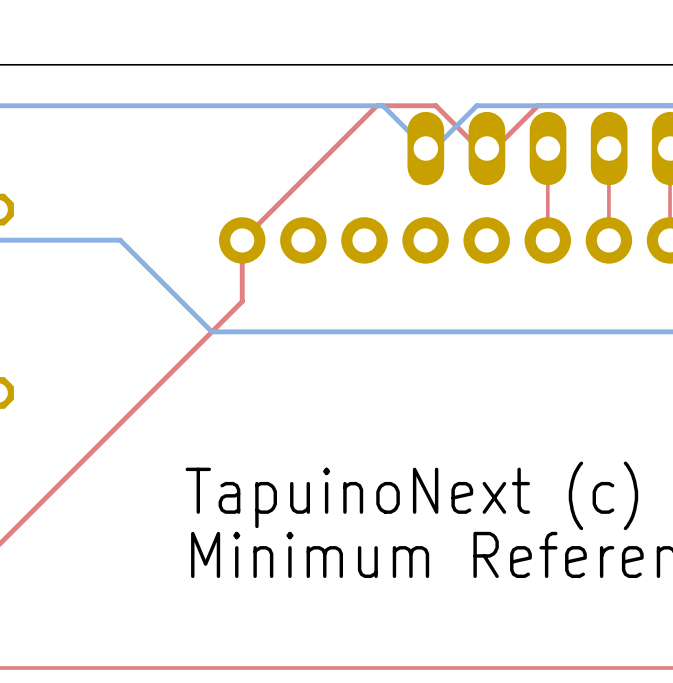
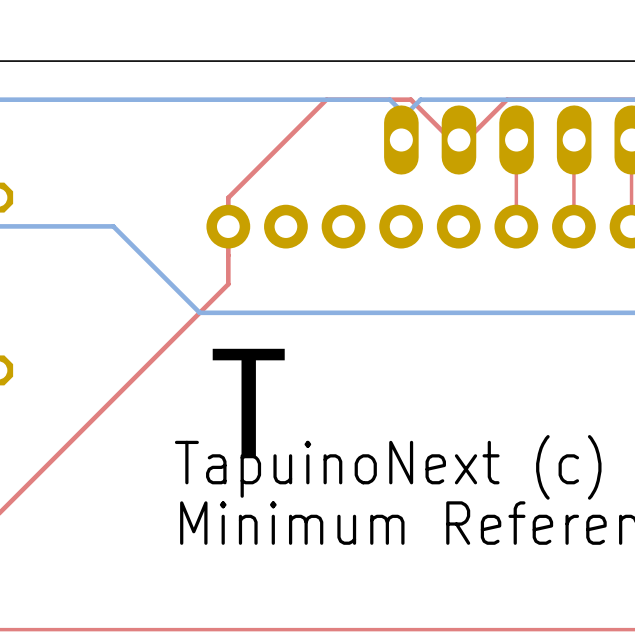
top track: (376, 105) (242, 240) -> (355, 99) (326, 99) (228, 197) (228, 226)
bottom track: none -> (361, 99) (389, 99) (401, 111) (401, 140)
bottom track: (476, 105) (434, 148) (425, 148) (383, 105) -> (449, 99) (420, 99) (401, 118)
drawing: none -> [212, 348, 285, 459]

